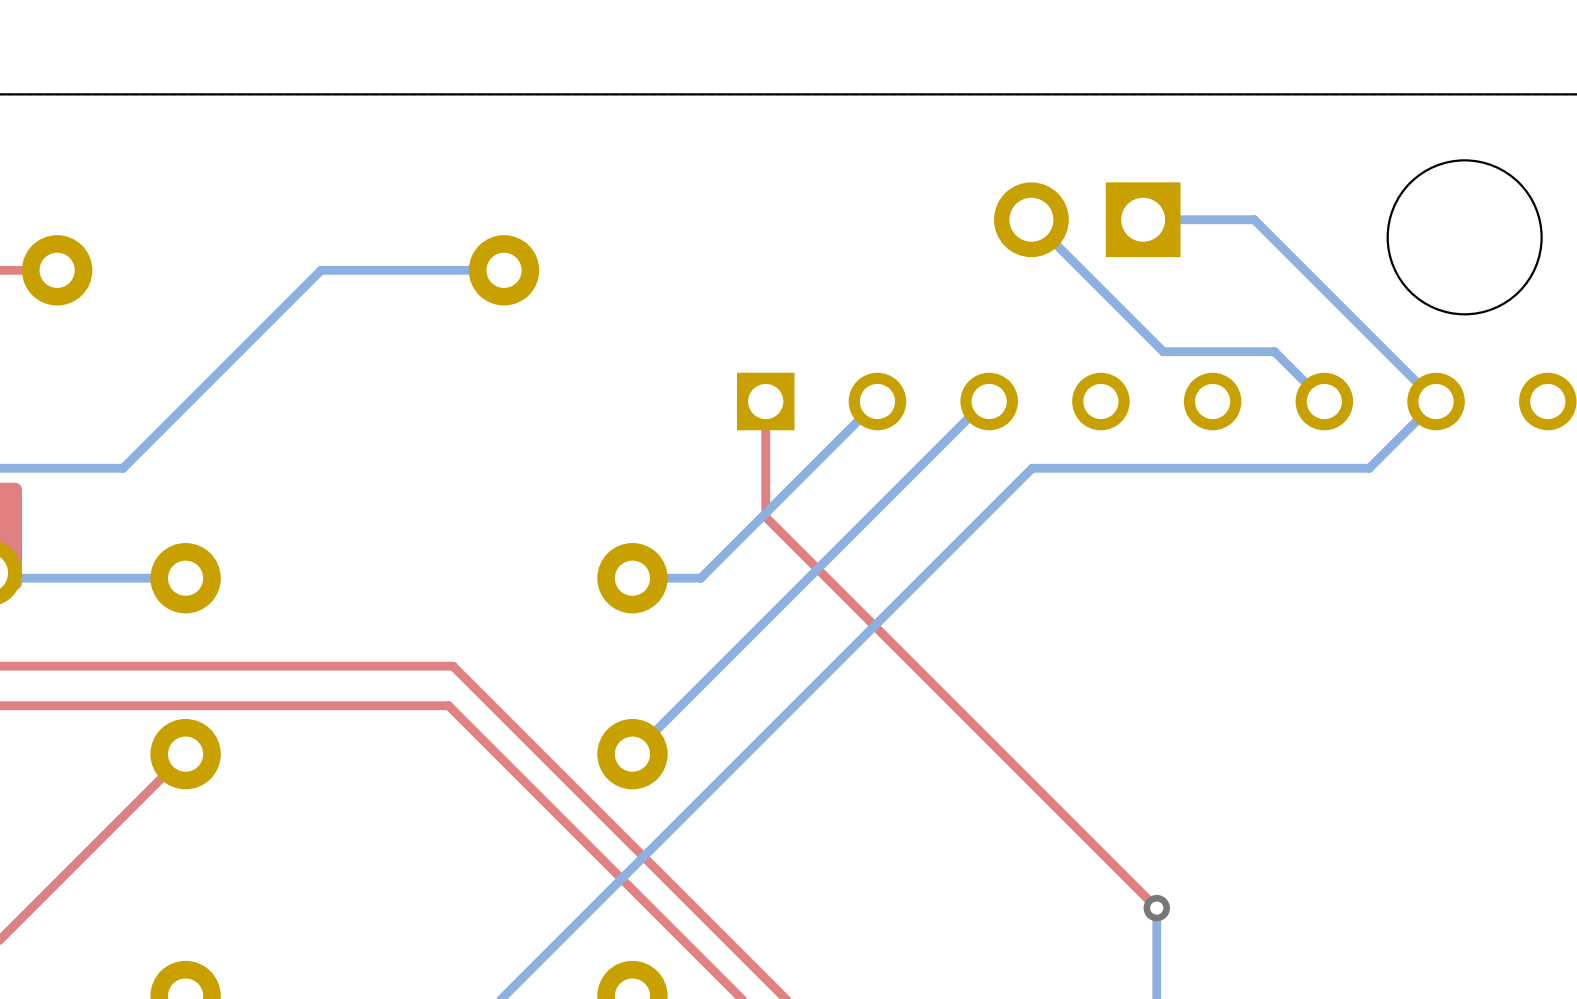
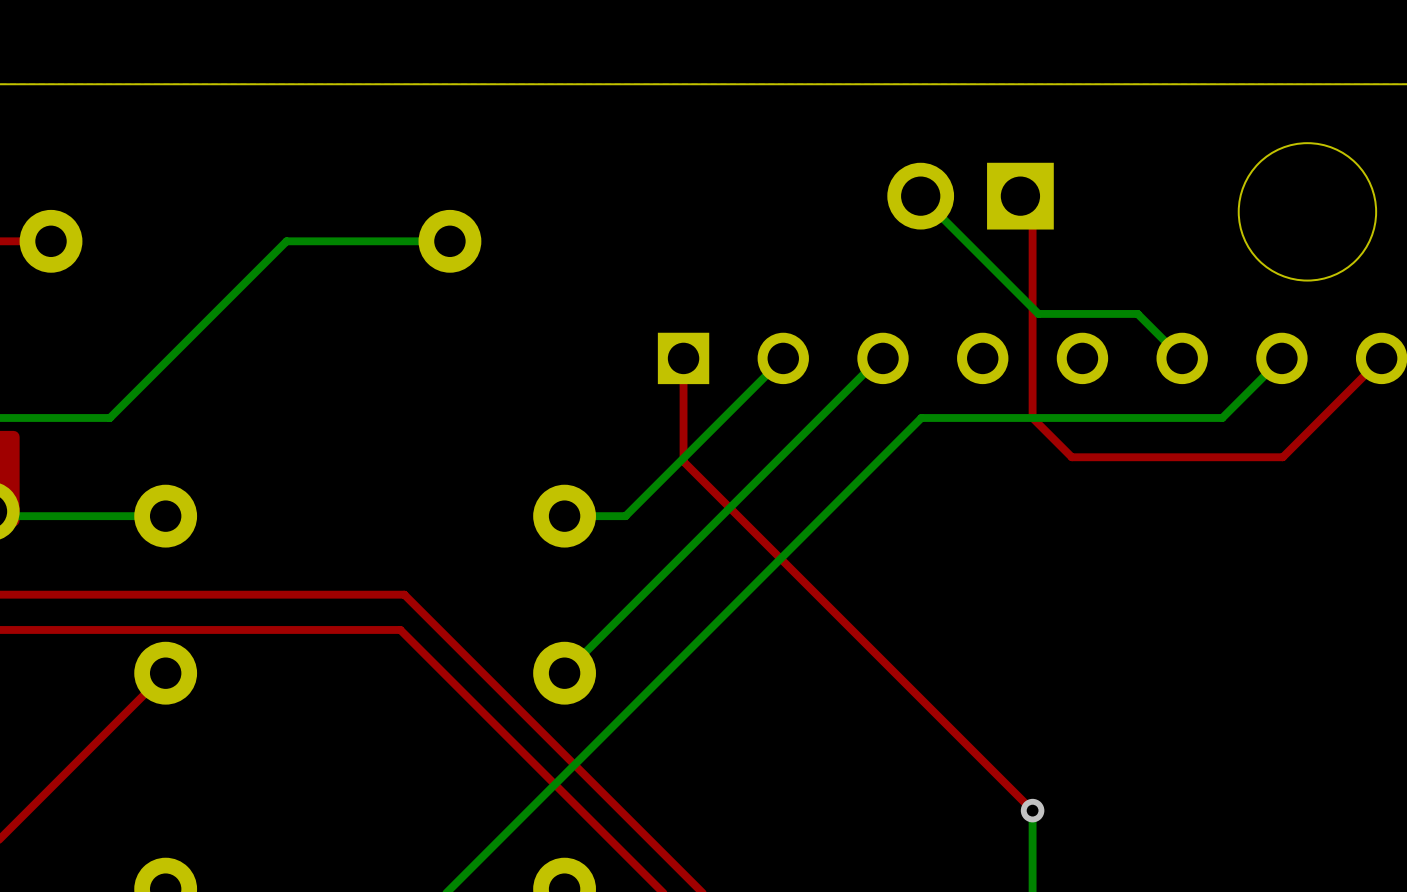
top track: none -> (1020, 196) (1032, 208) (1032, 417) (1071, 457) (1282, 457) (1381, 358)
bottom track: (1143, 219) (1254, 219) (1436, 401) -> none

